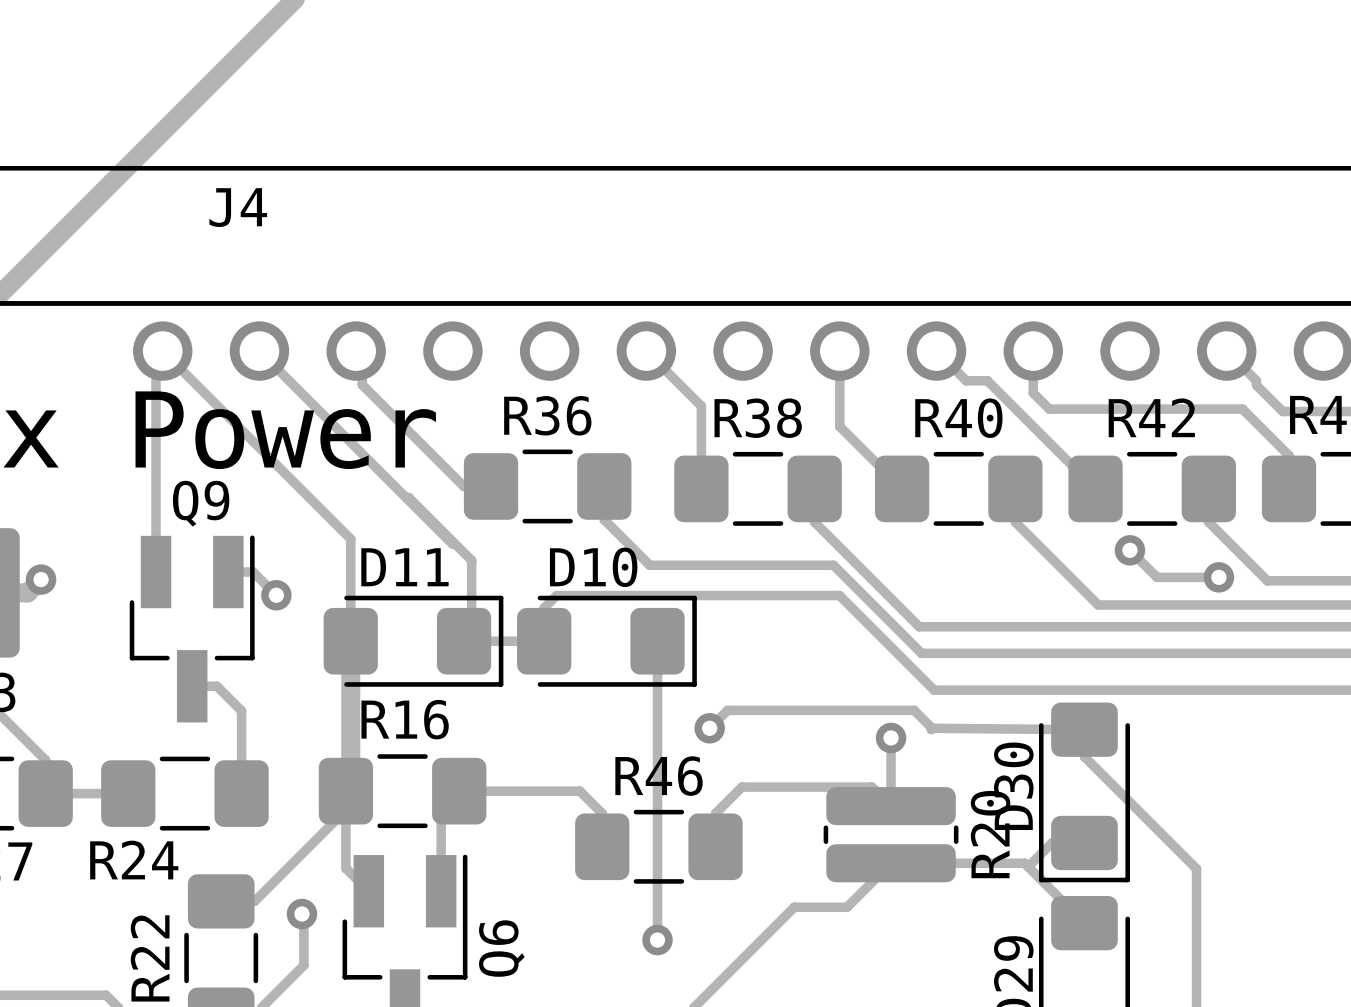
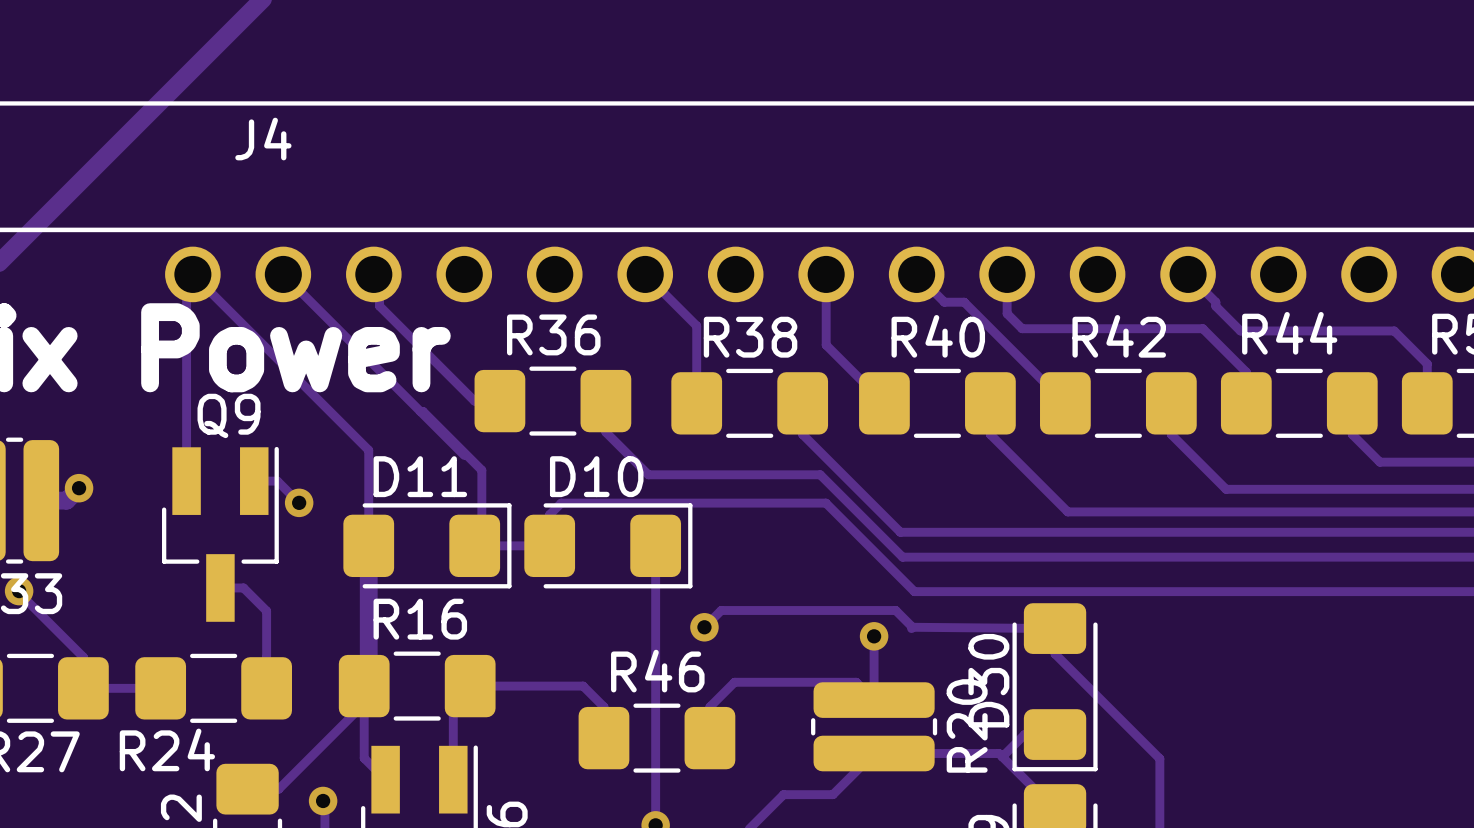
track: (1129, 550) (1156, 577) (1218, 577) -> none
via: (1129, 550) -> none
via: (1218, 577) -> none

